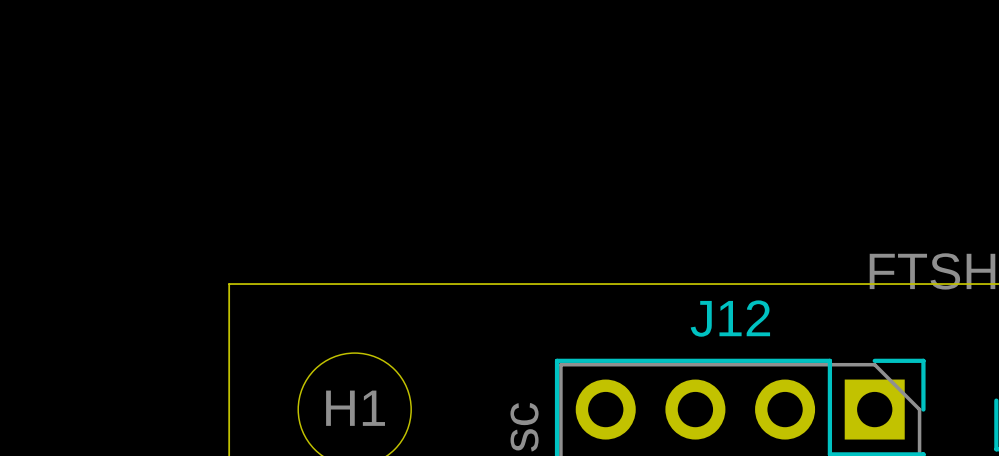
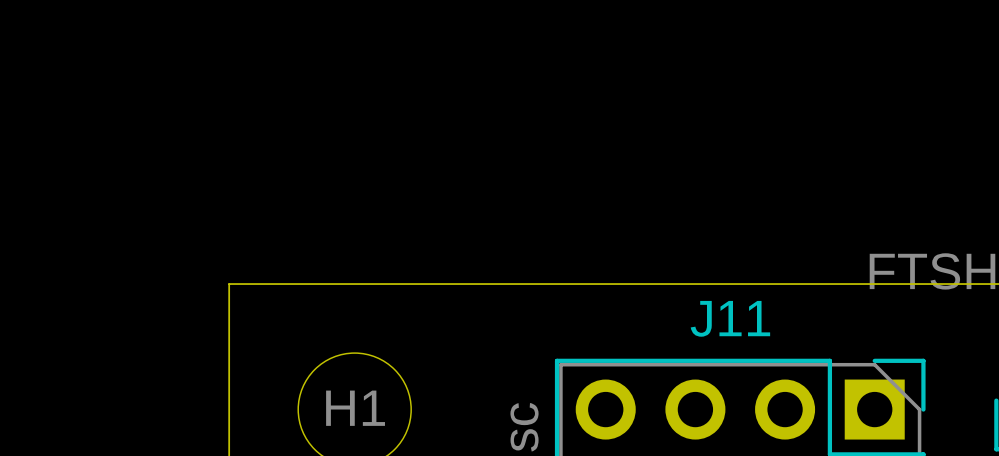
J12 name: J12 (730, 318) -> J11 (730, 318)

